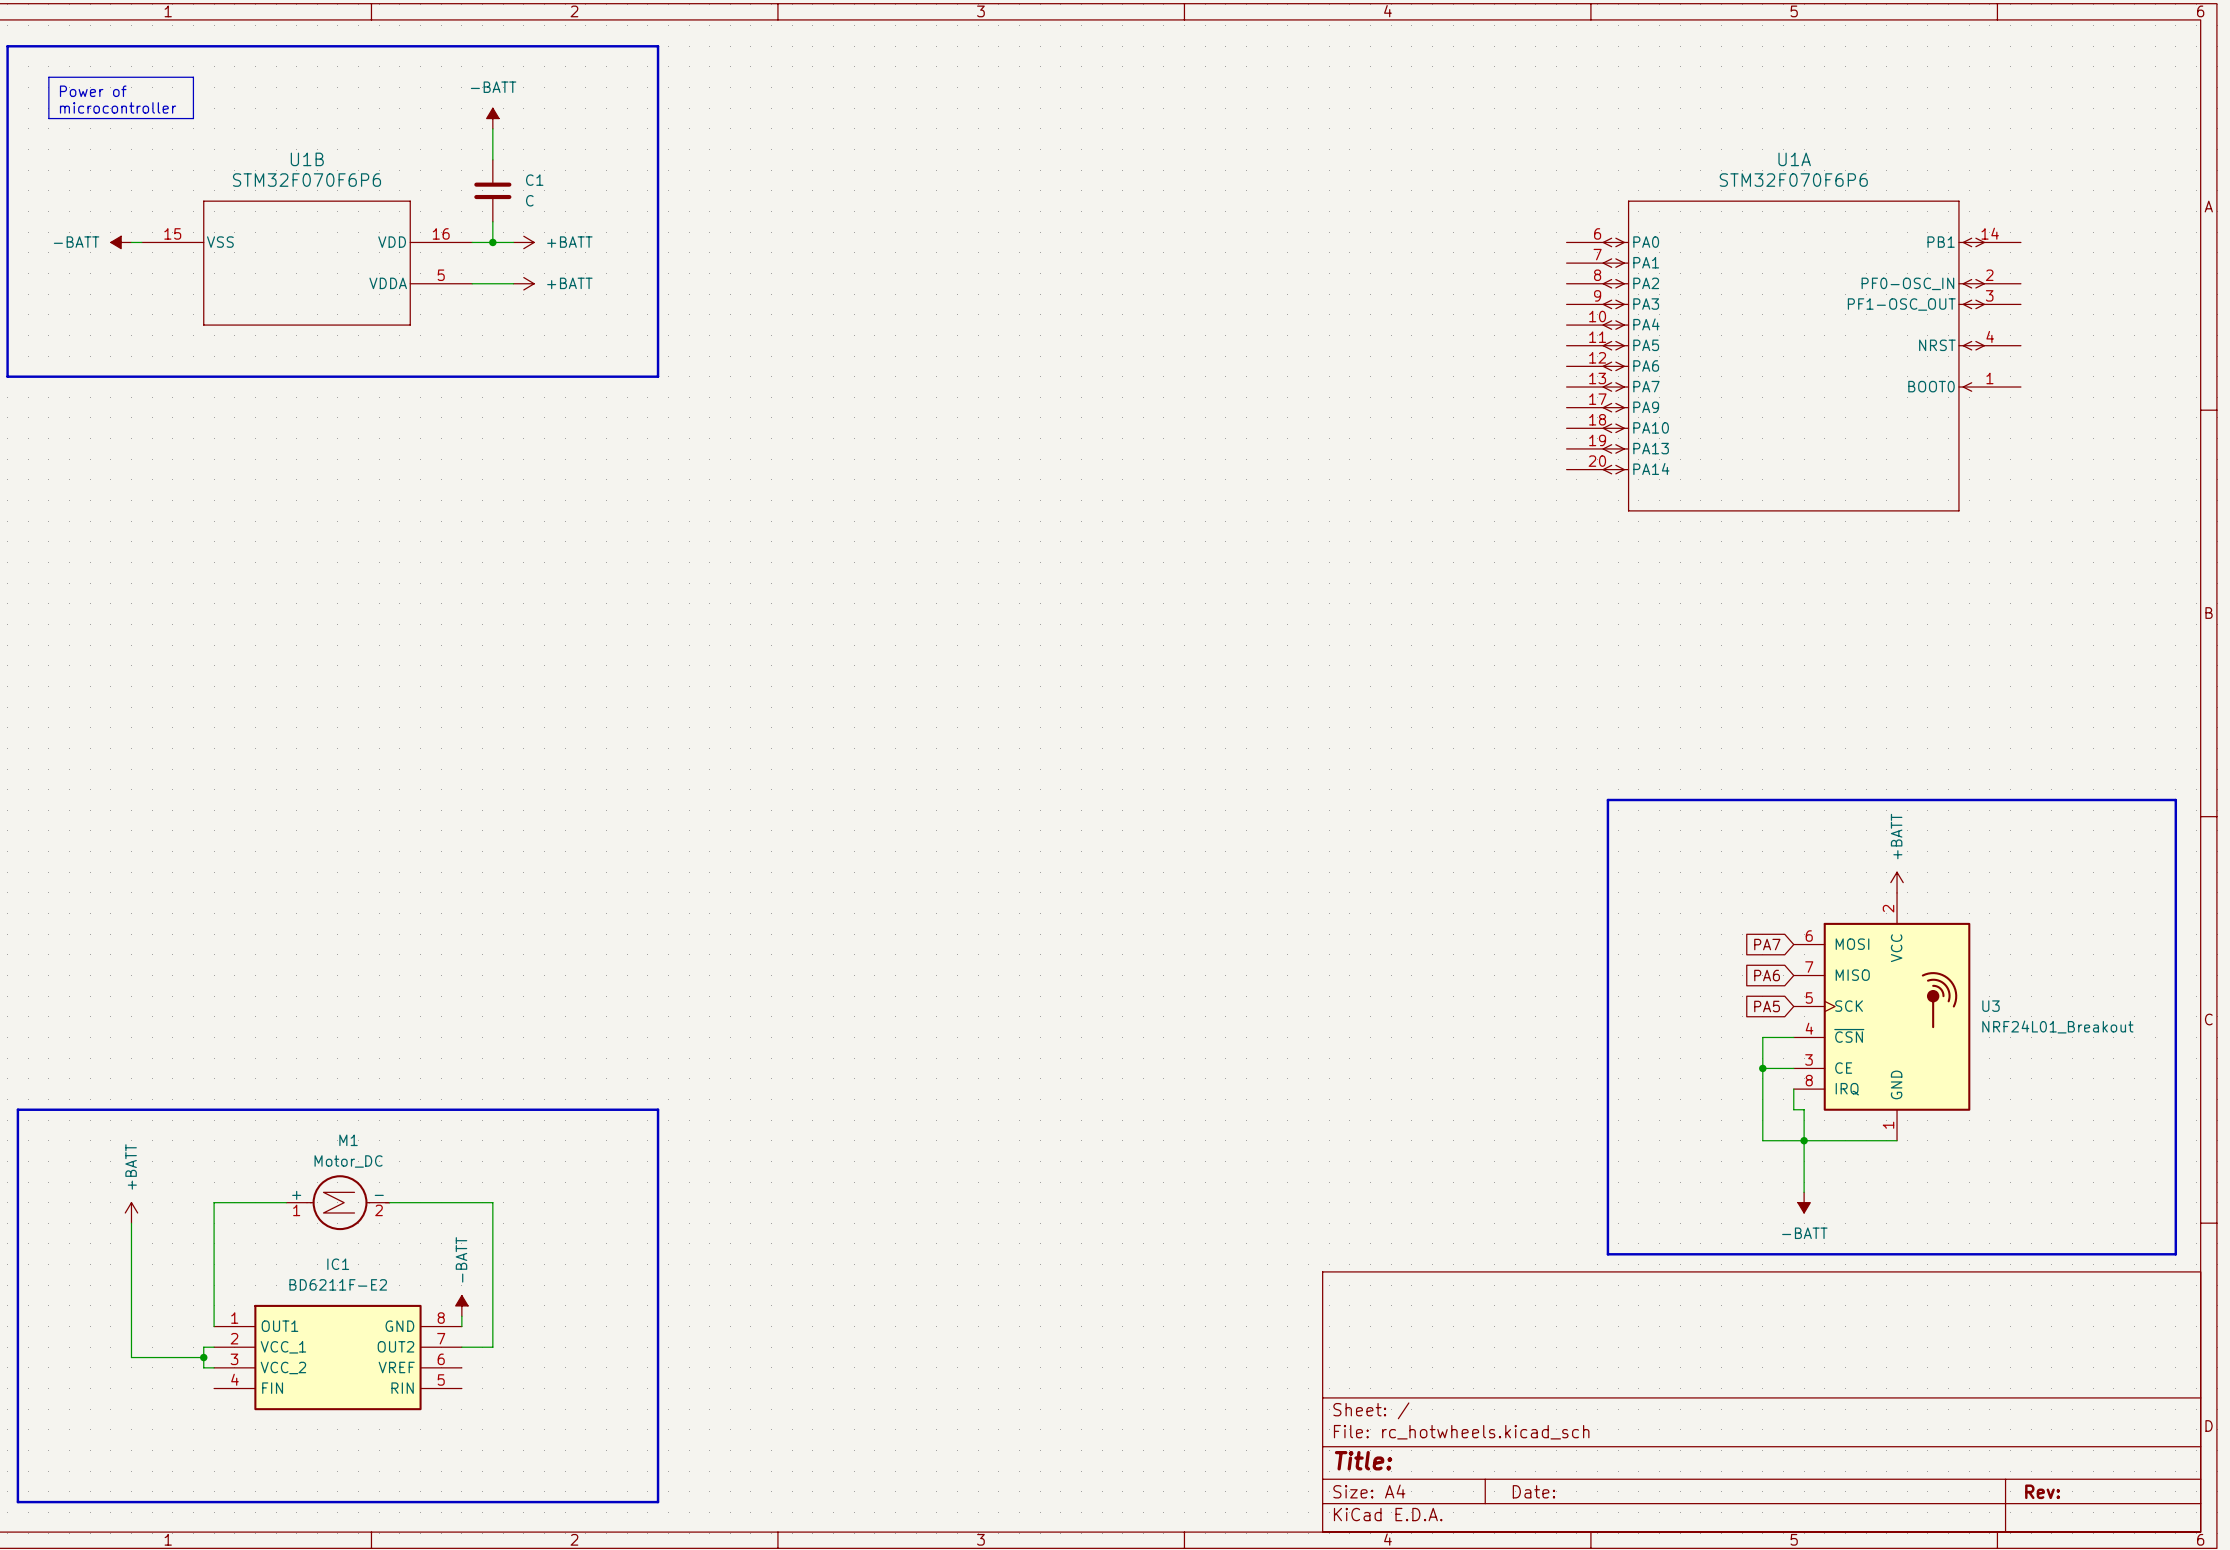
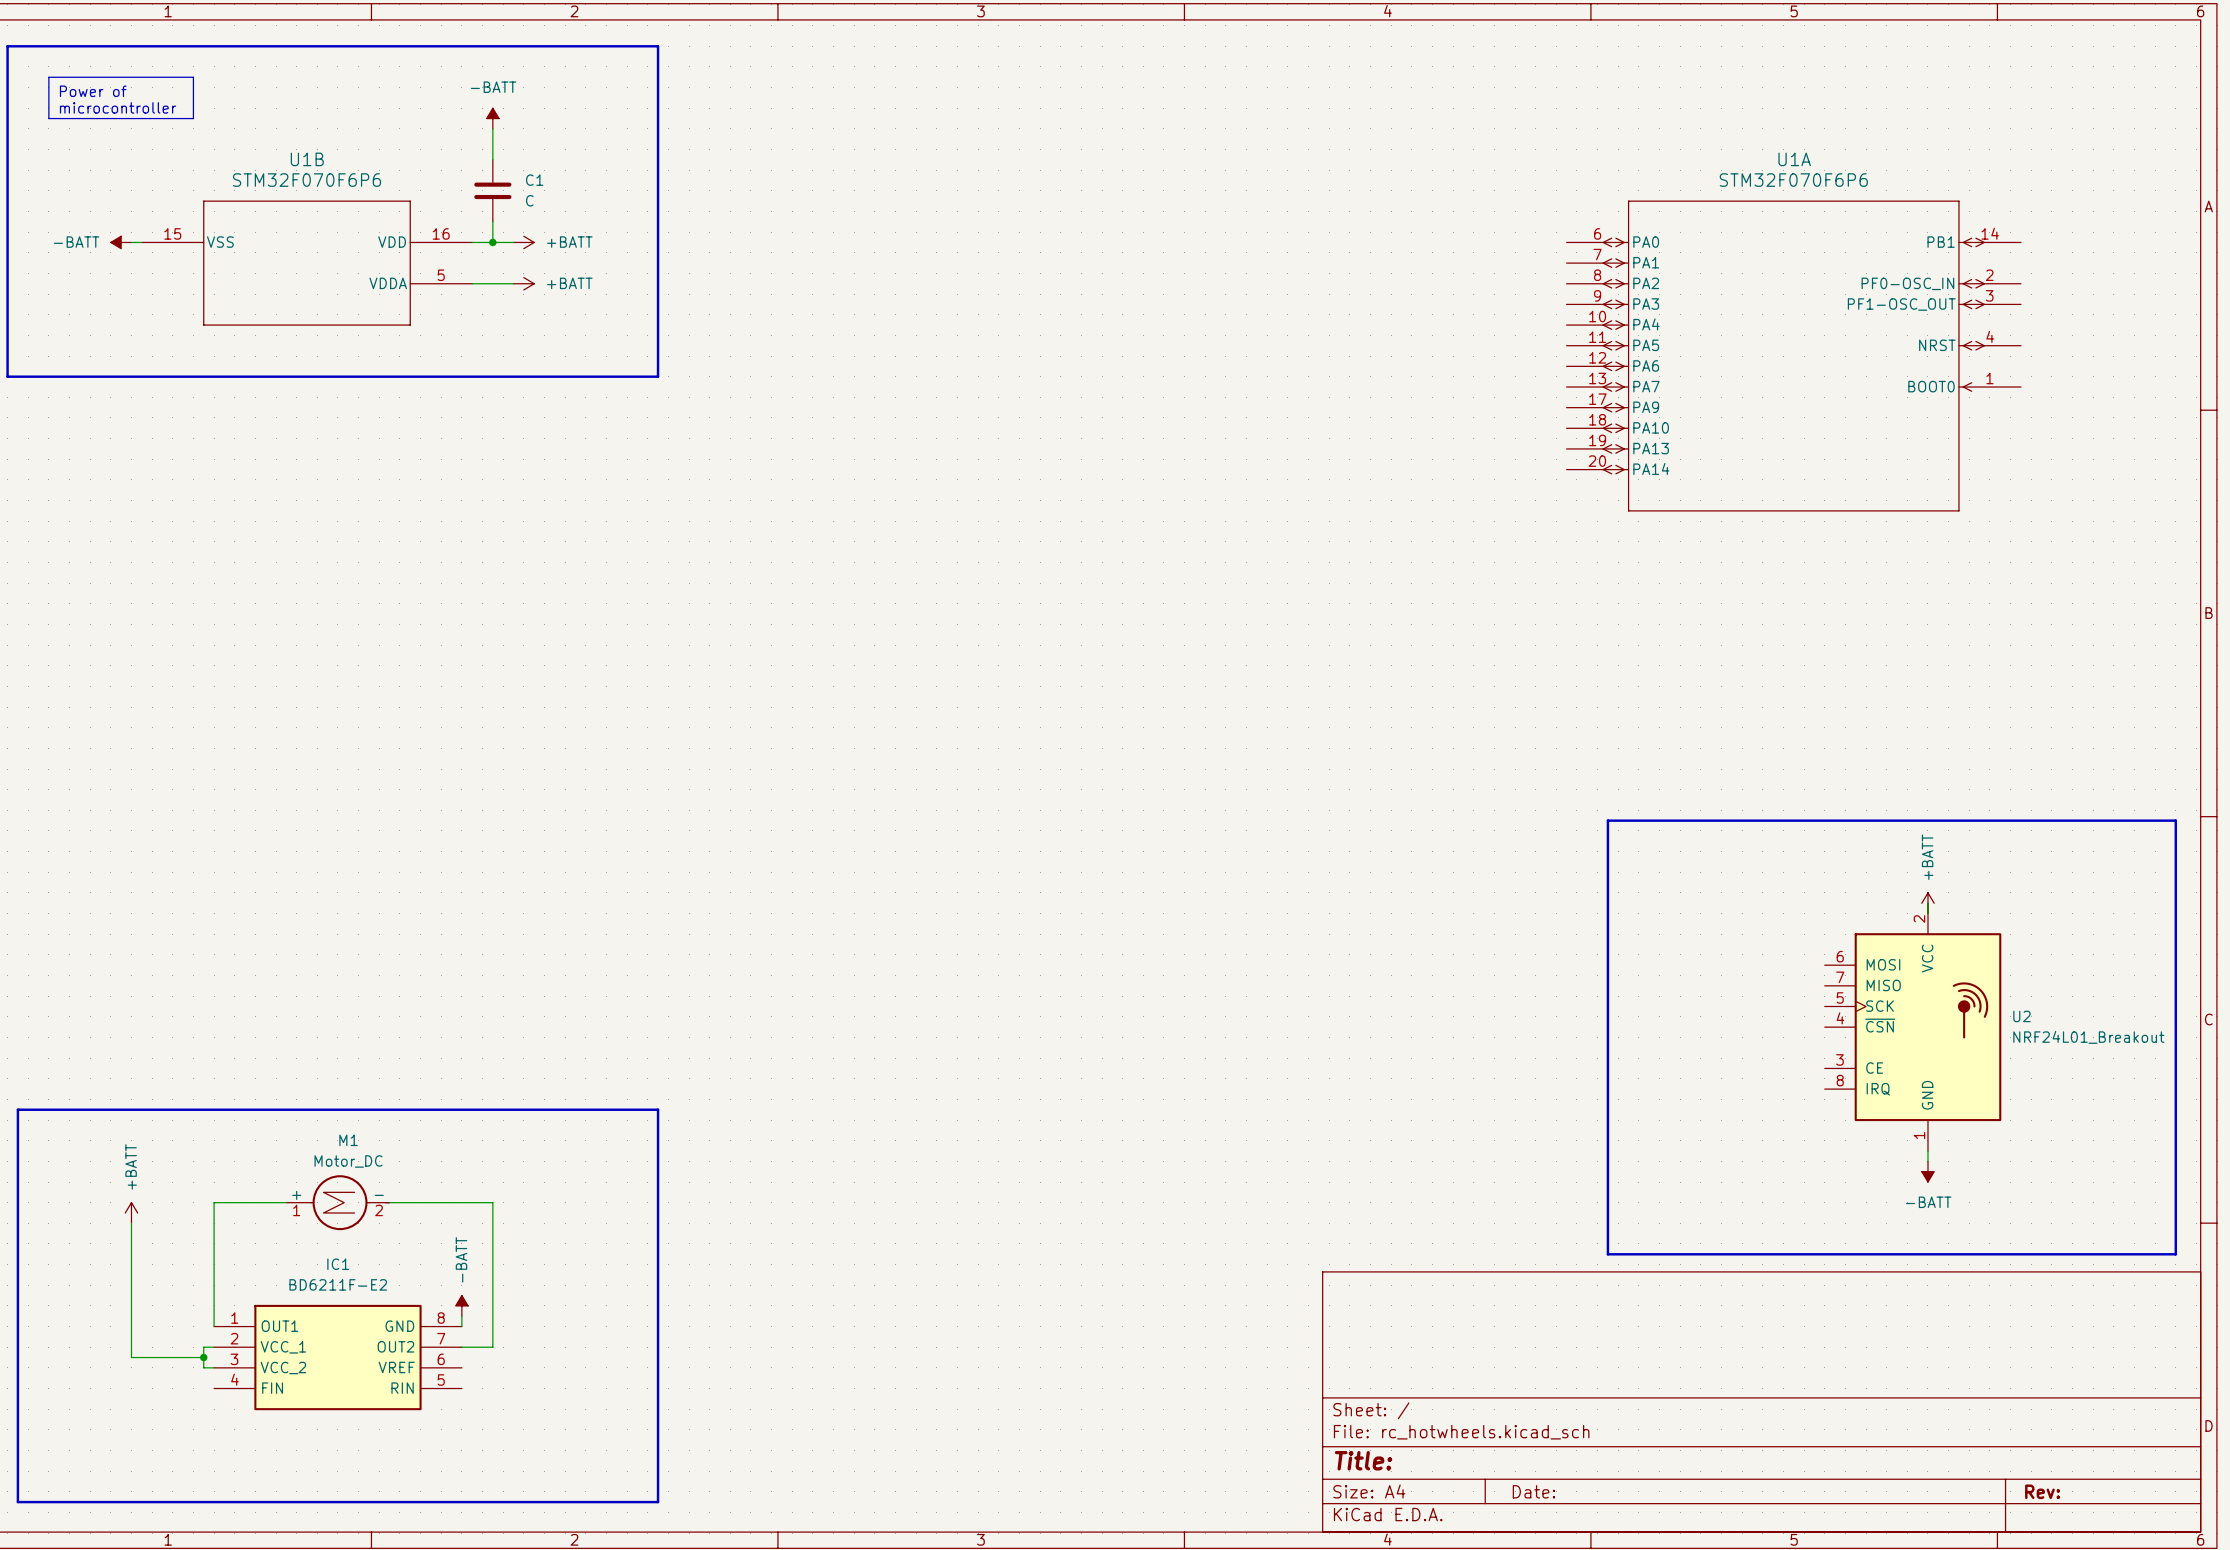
line: (1607, 820) (1607, 800) (2175, 800) (2175, 820) -> (1607, 820) (2175, 820)
power symbol position: +BATT (1897, 882) -> +BATT (1927, 903)
wire: none -> (1927, 903) (1927, 913)
global label: PA7 (1767, 944) -> none
global label: PA6 (1767, 975) -> none
global label: PA5 (1767, 1006) -> none
U3: NRF24L01_Breakout (1882, 1016) -> none
U2: none -> NRF24L01_Breakout (1913, 1027)
wire: (1793, 1037) (1762, 1037) (1762, 1140) (1897, 1140) -> none
wire: (1762, 1068) (1793, 1068) -> none
junction: (1762, 1068) -> none
wire: (1793, 1089) (1793, 1109) (1804, 1109) (1804, 1192) -> none
junction: (1804, 1140) -> none
wire: none -> (1927, 1151) (1927, 1161)
power symbol position: -BATT (1804, 1202) -> -BATT (1927, 1171)

